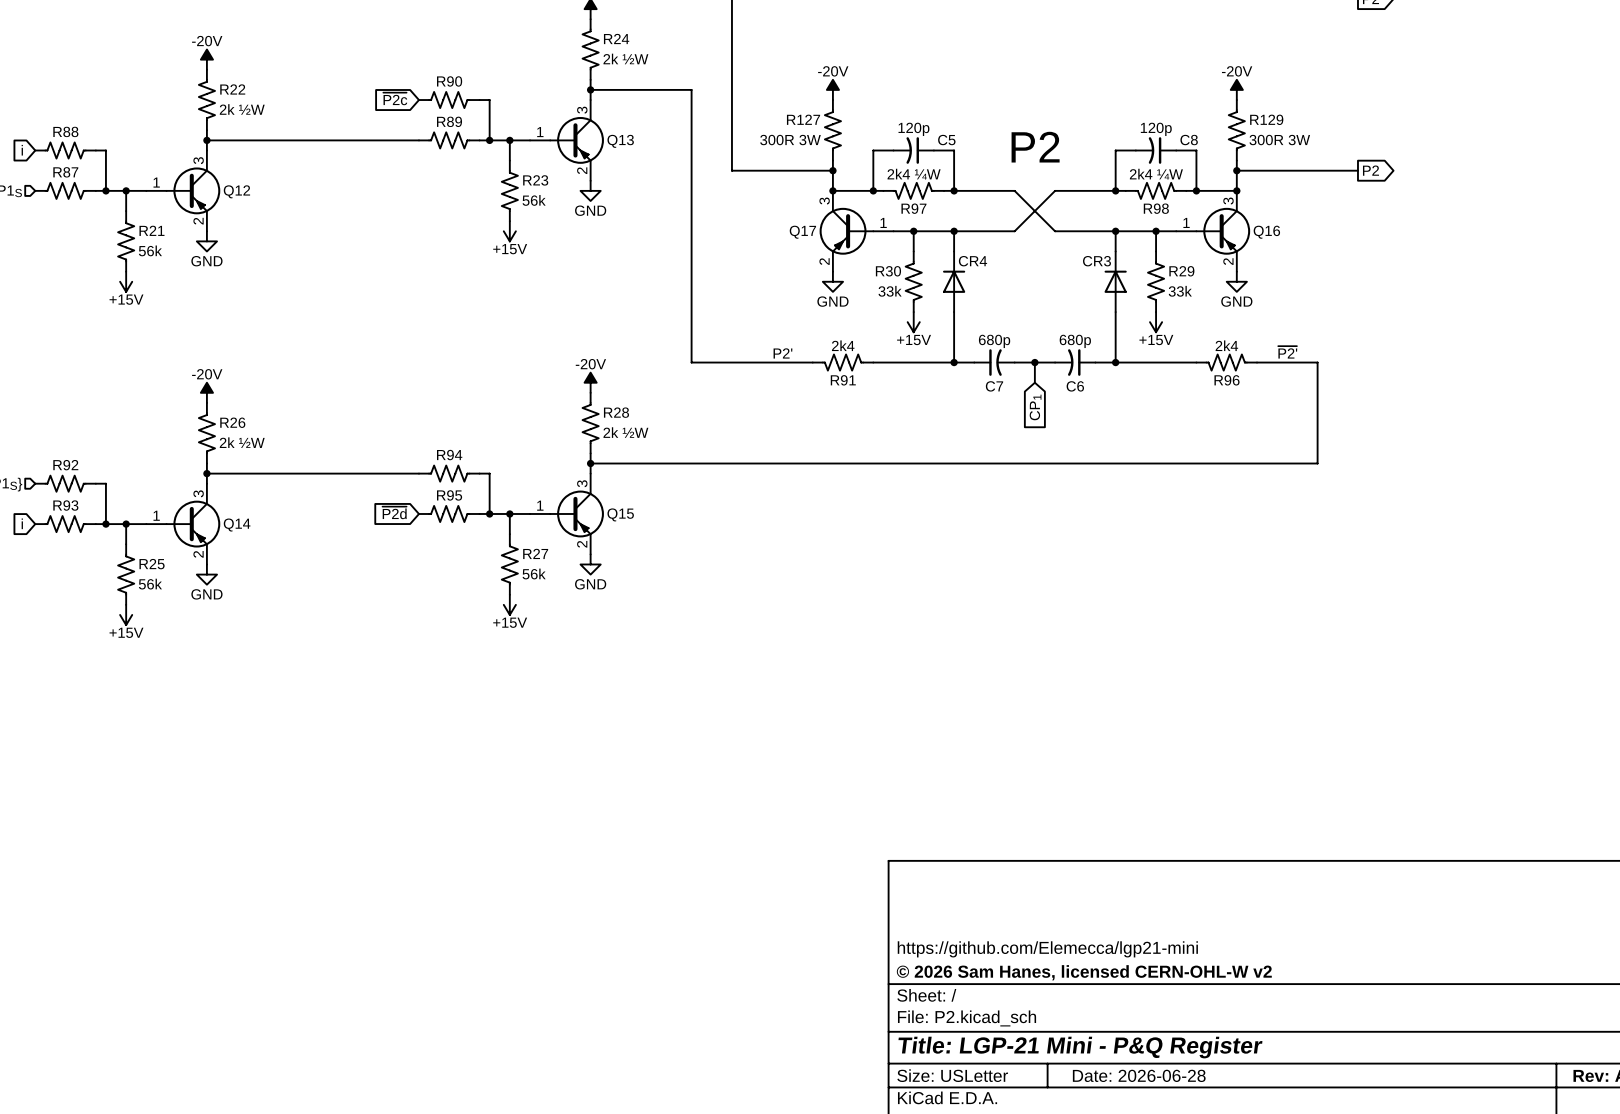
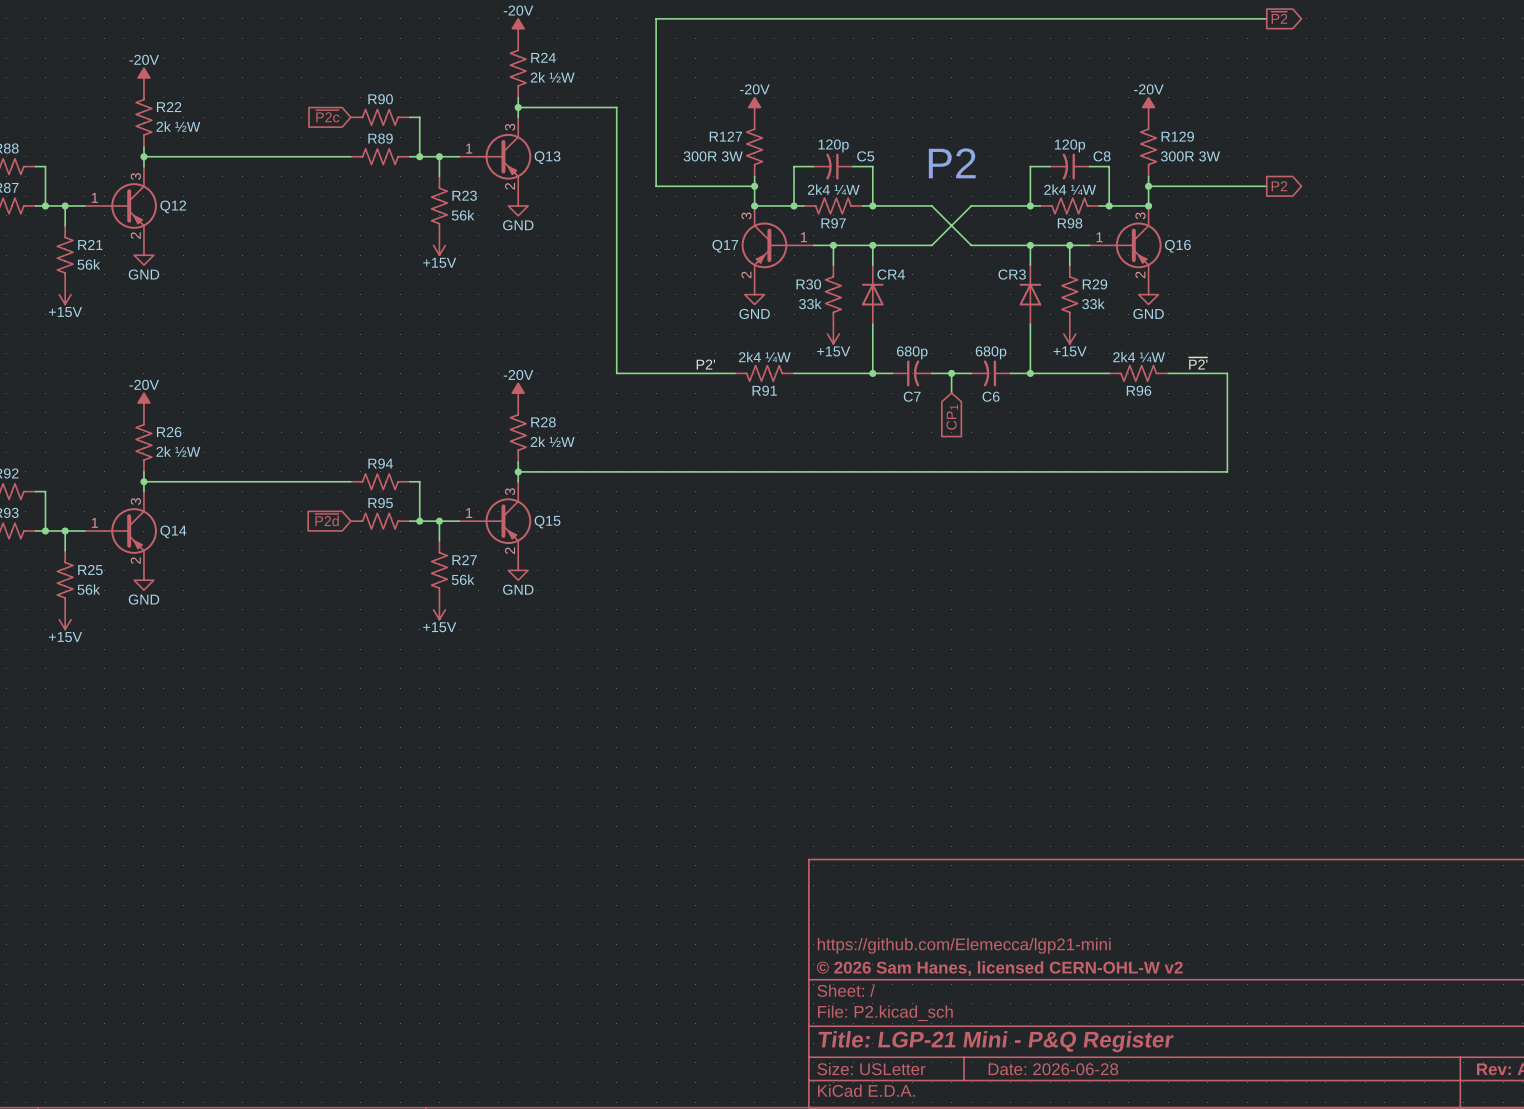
R91 value: 2k4 (843, 345) -> 2k4 ¼W (764, 357)
R96 value: 2k4 (1226, 345) -> 2k4 ¼W (1139, 357)

